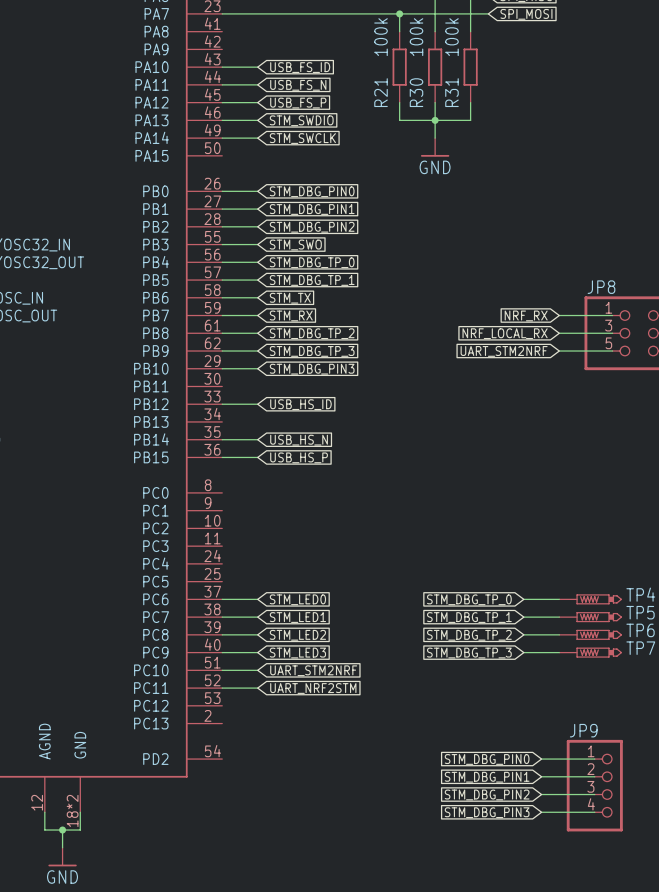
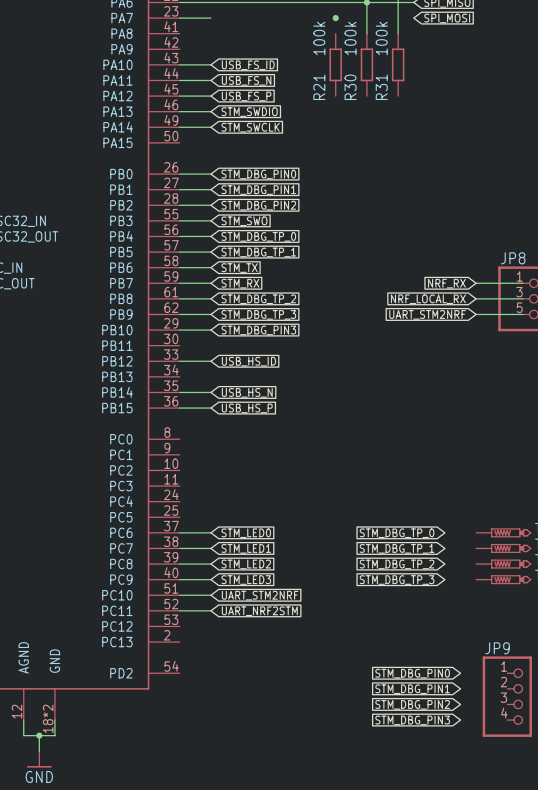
wire: (257, 13) (488, 13) -> none
wire: (399, 13) (399, 31) -> none
wire: (399, 102) (399, 120) (470, 120) (470, 102) -> none
wire: (435, 102) (435, 138) -> none
junction: (435, 120) -> none
power symbol: GND (435, 147) -> none
wire: (523, 599) (559, 599) -> none
wire: (523, 617) (559, 617) -> none
wire: (523, 634) (559, 634) -> none
wire: (523, 652) (559, 652) -> none
wire: (541, 759) (594, 759) -> none
wire: (541, 776) (594, 776) -> none
wire: (541, 794) (594, 794) -> none
wire: (541, 812) (594, 812) -> none

